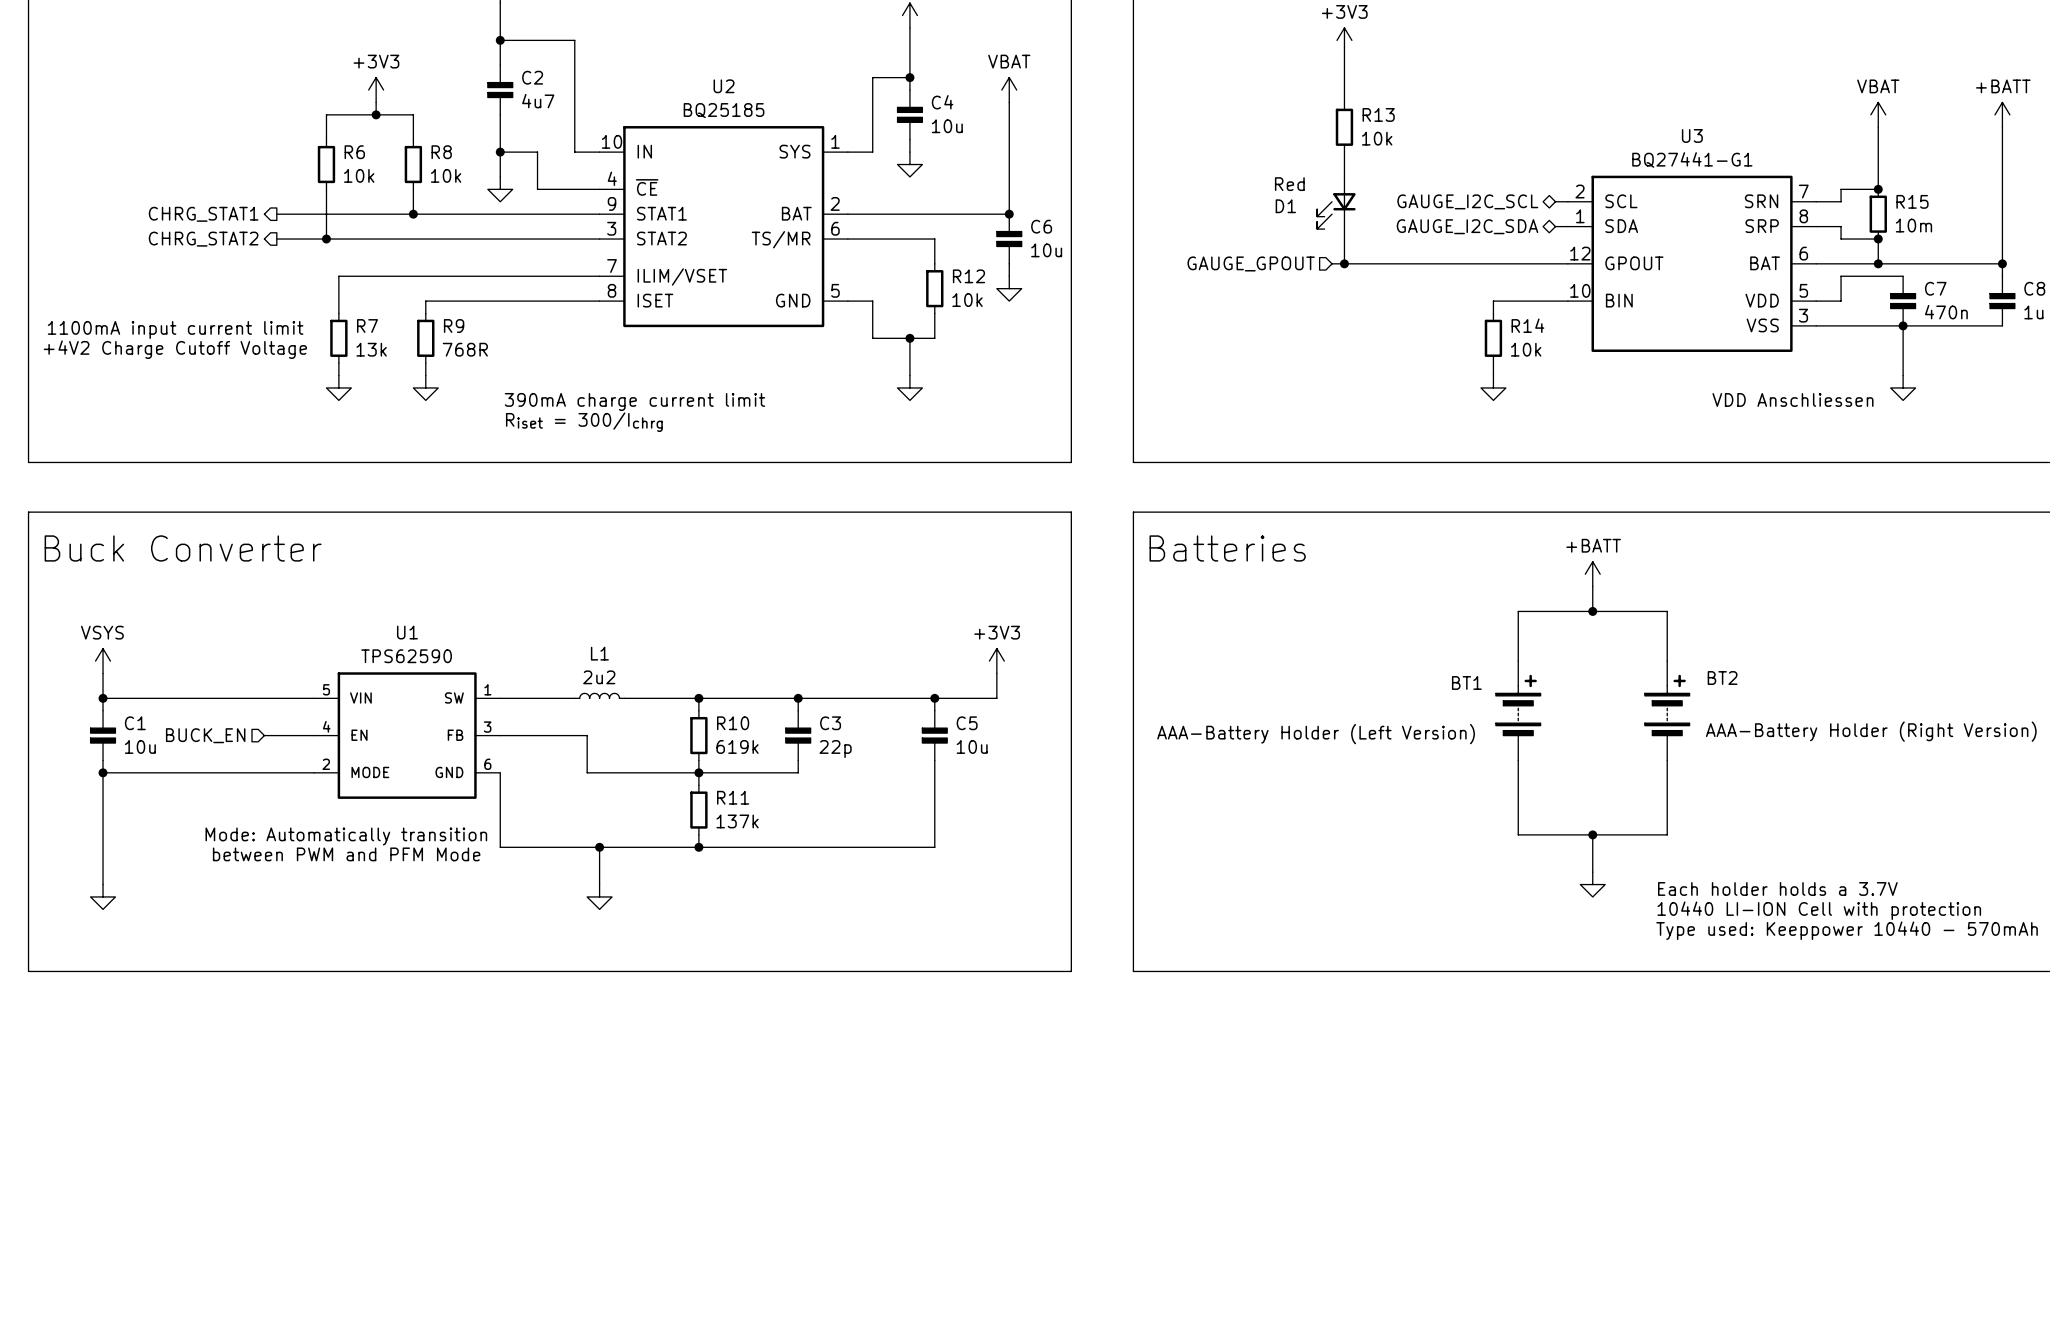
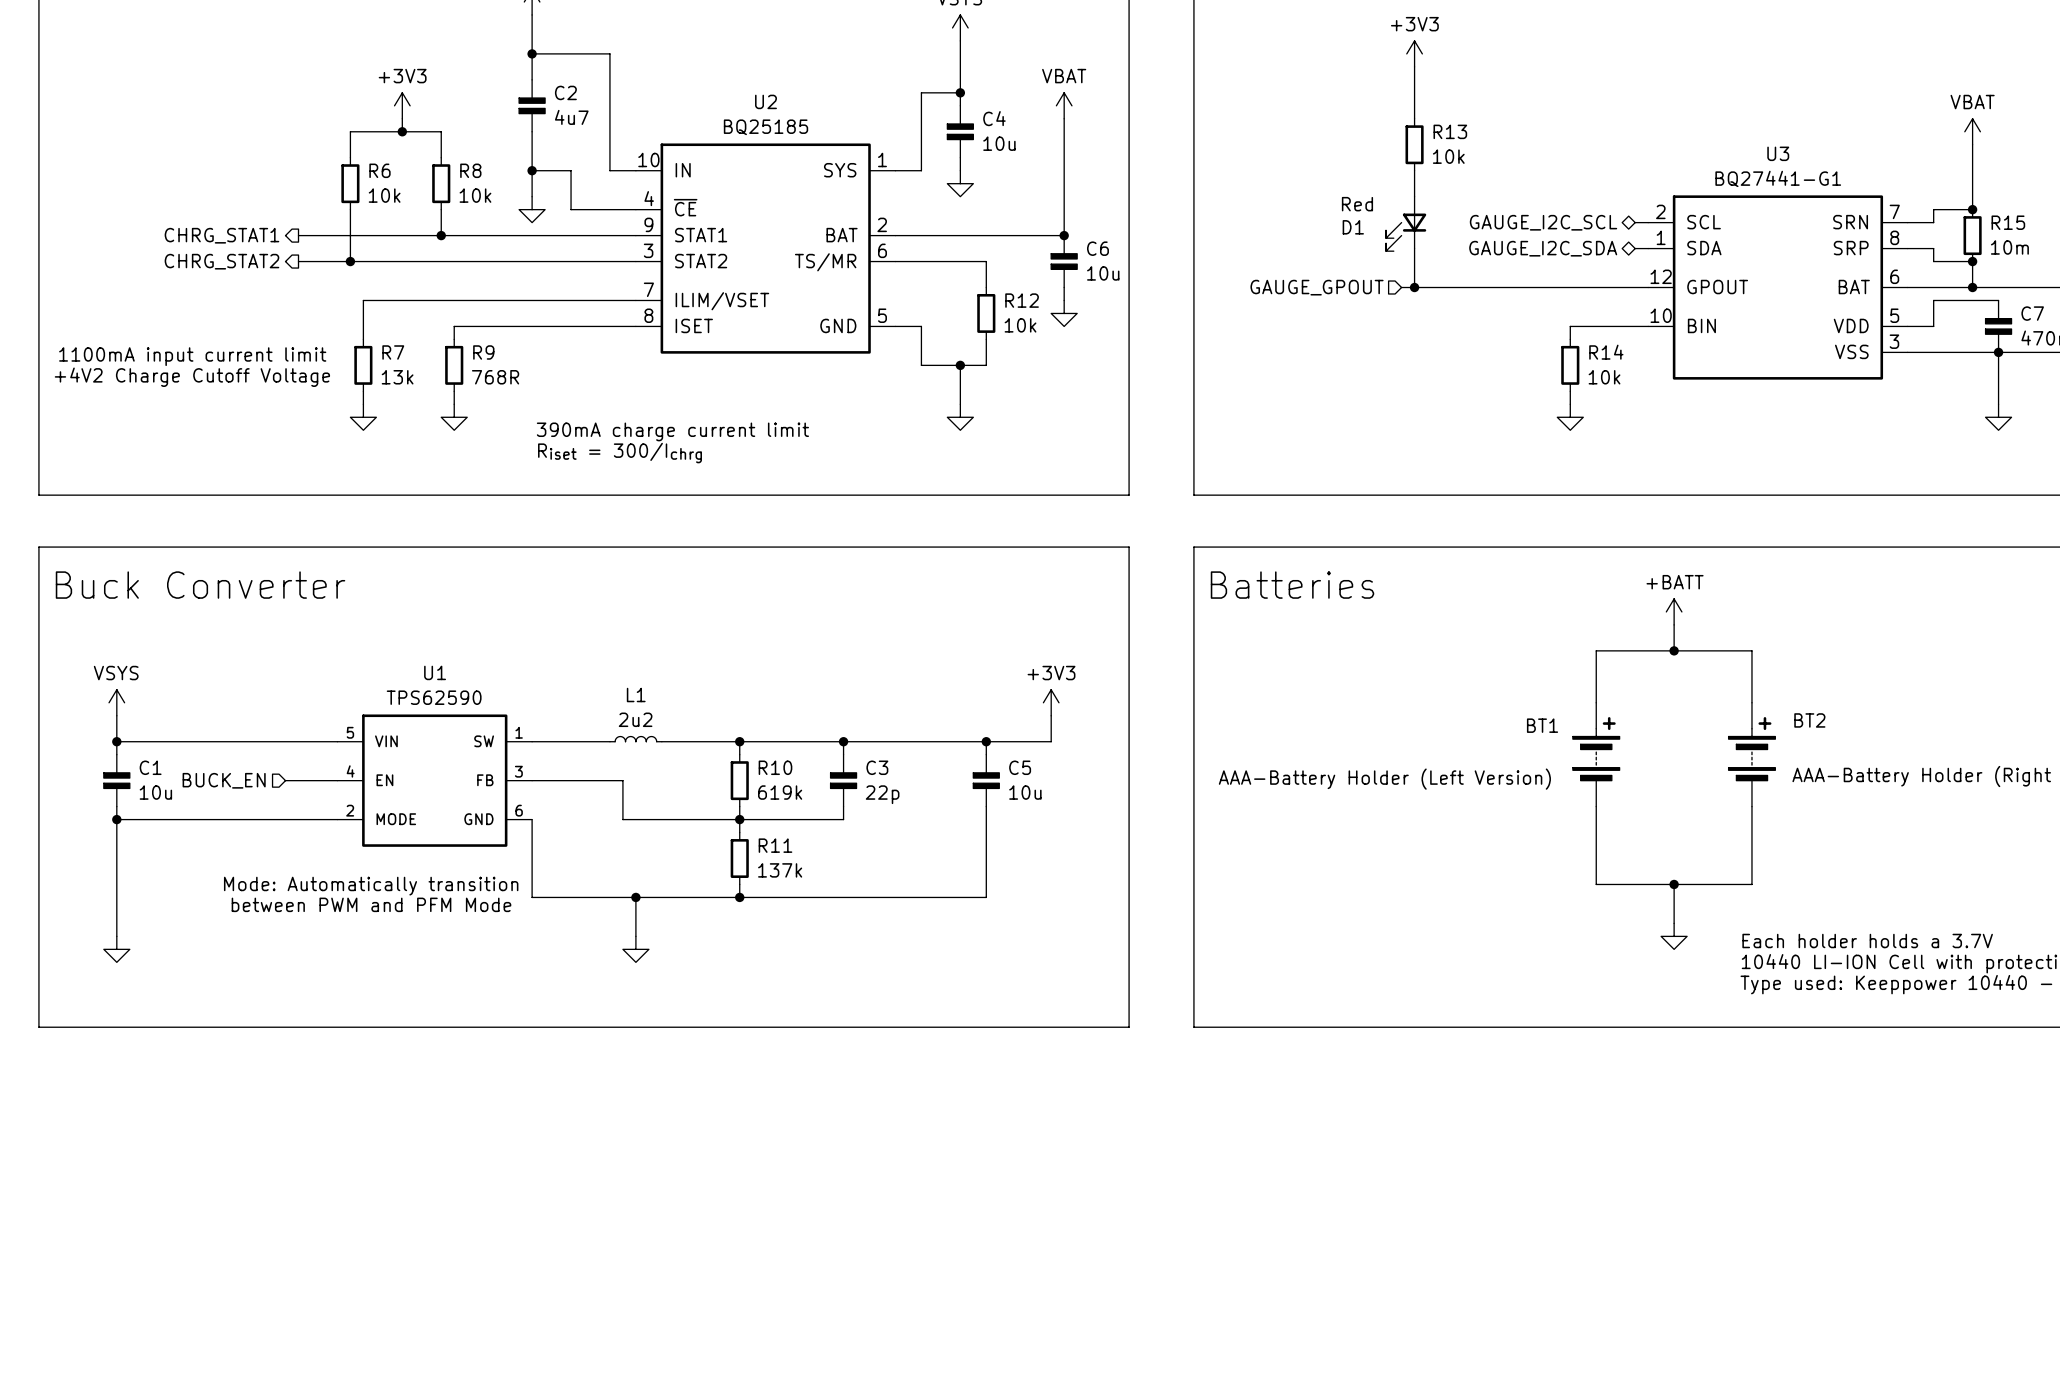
text: VDD Anschliessen (1792, 399) -> none

